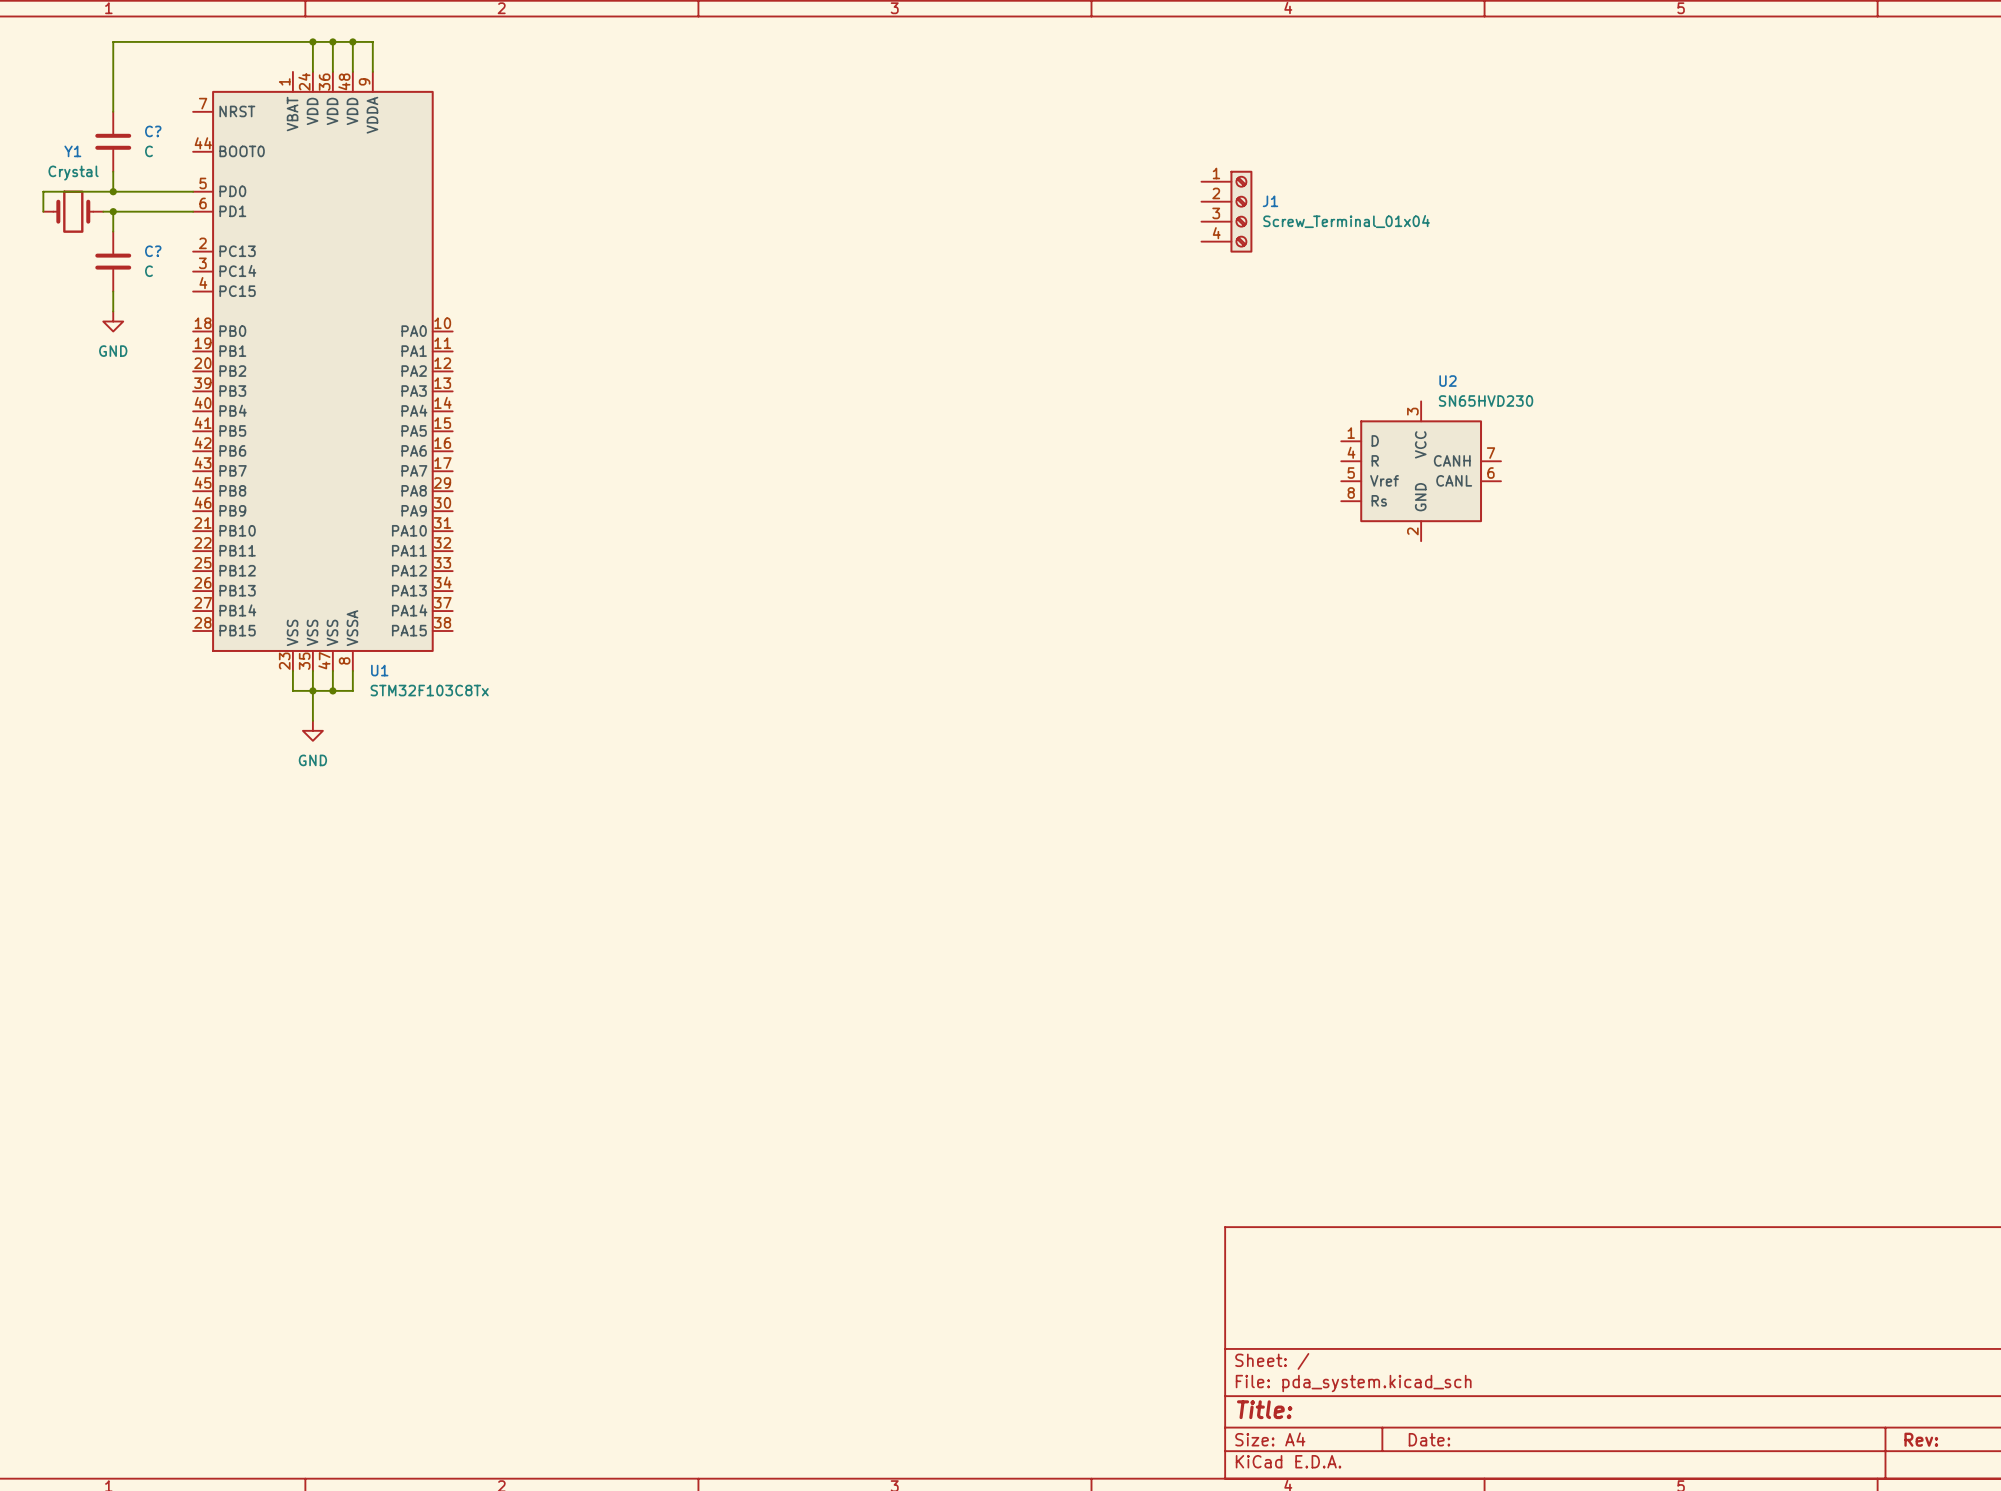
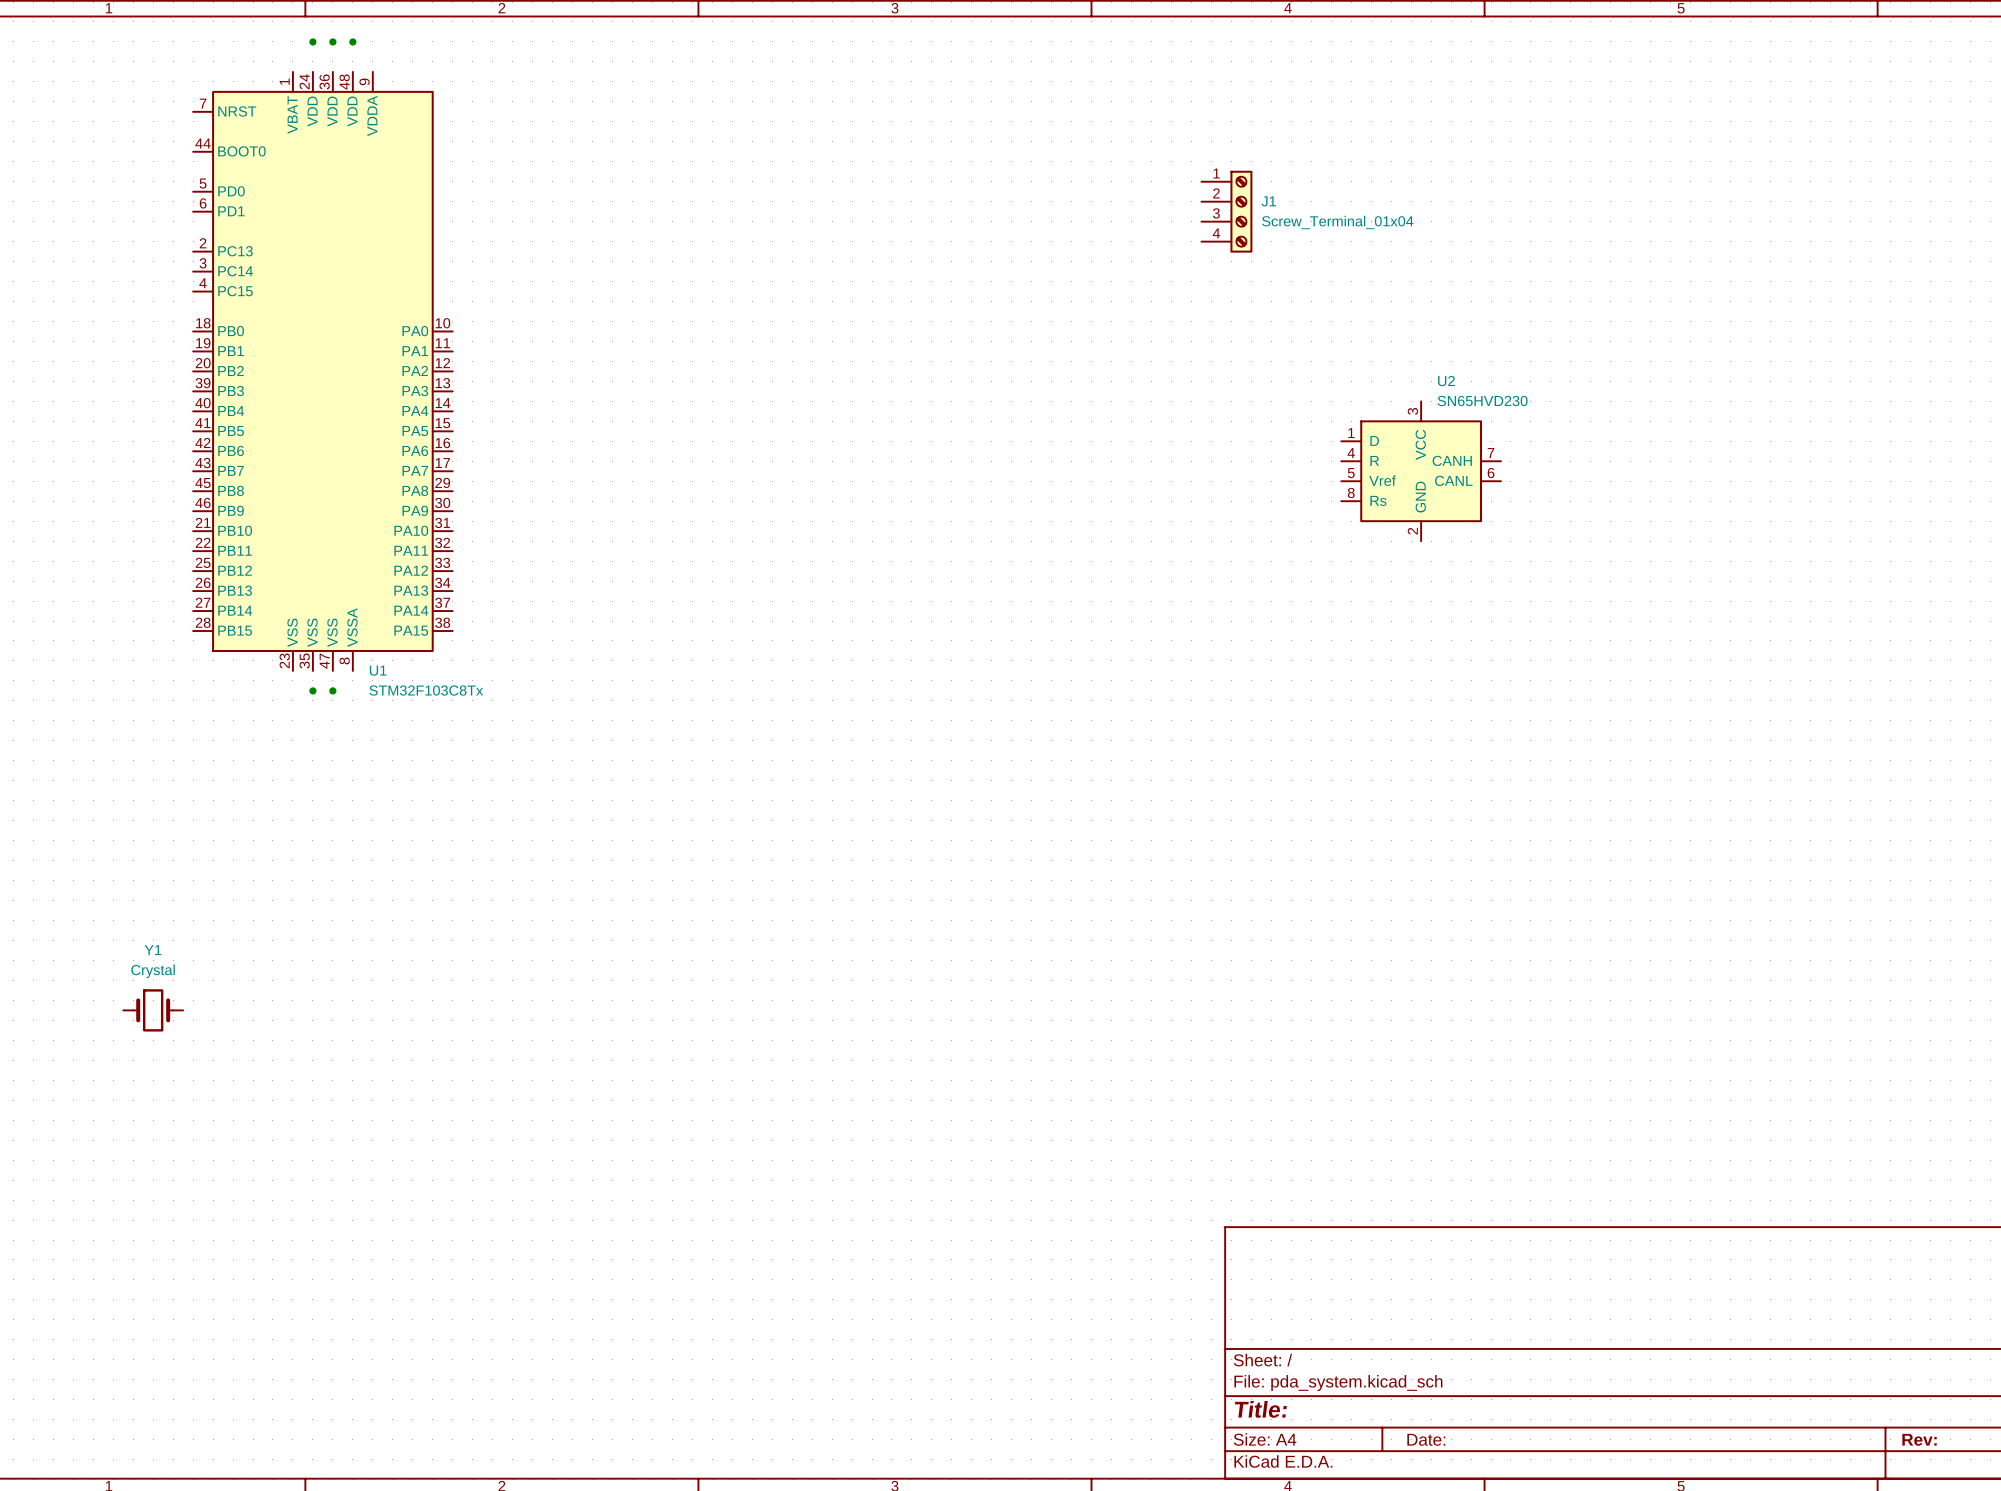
wire: (312, 41) (312, 71) -> none
wire: (332, 41) (332, 71) -> none
wire: (352, 41) (352, 71) -> none
wire: (372, 71) (372, 41) (113, 41) (113, 111) -> none
C?: C (113, 141) -> none
wire: (113, 171) (113, 191) -> none
junction: (113, 191) -> none
wire: (193, 191) (43, 191) (43, 211) -> none
Y1 position: (73, 211) -> (153, 1010)
wire: (103, 211) (193, 211) -> none
wire: (113, 211) (113, 231) -> none
junction: (113, 211) -> none
C?: C (113, 261) -> none
wire: (113, 291) (113, 311) -> none
power symbol: GND (113, 321) -> none
wire: (292, 670) (292, 690) (352, 690) (352, 670) -> none
wire: (312, 670) (312, 720) -> none
wire: (332, 670) (332, 690) -> none
power symbol: GND (312, 730) -> none

